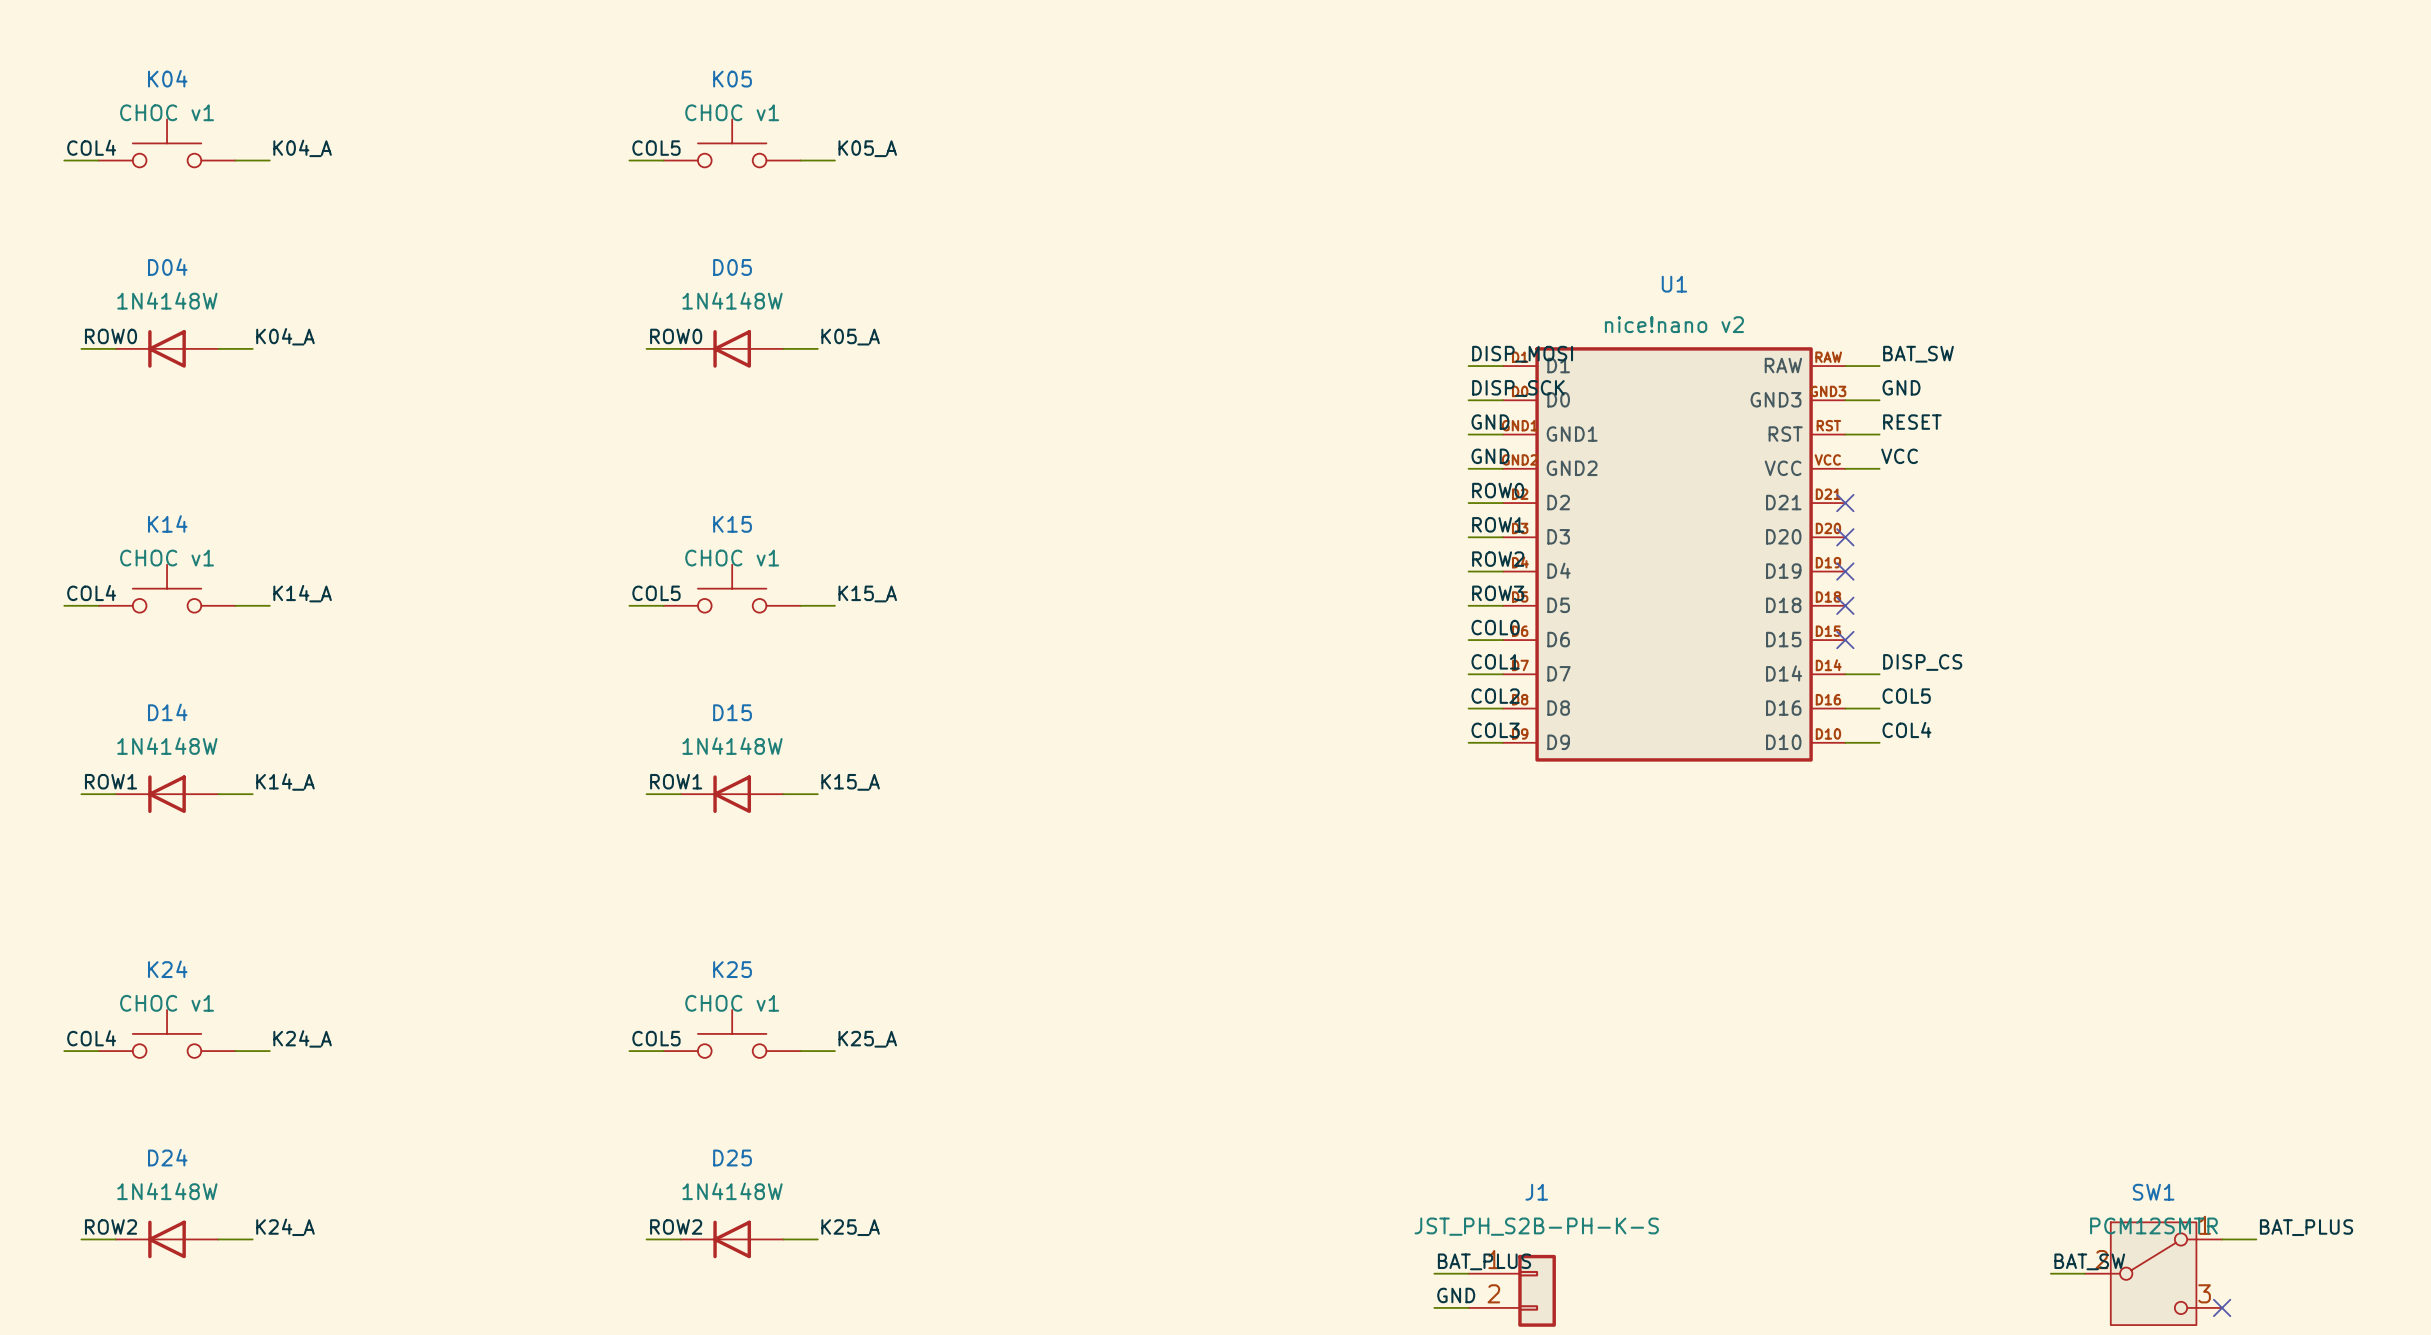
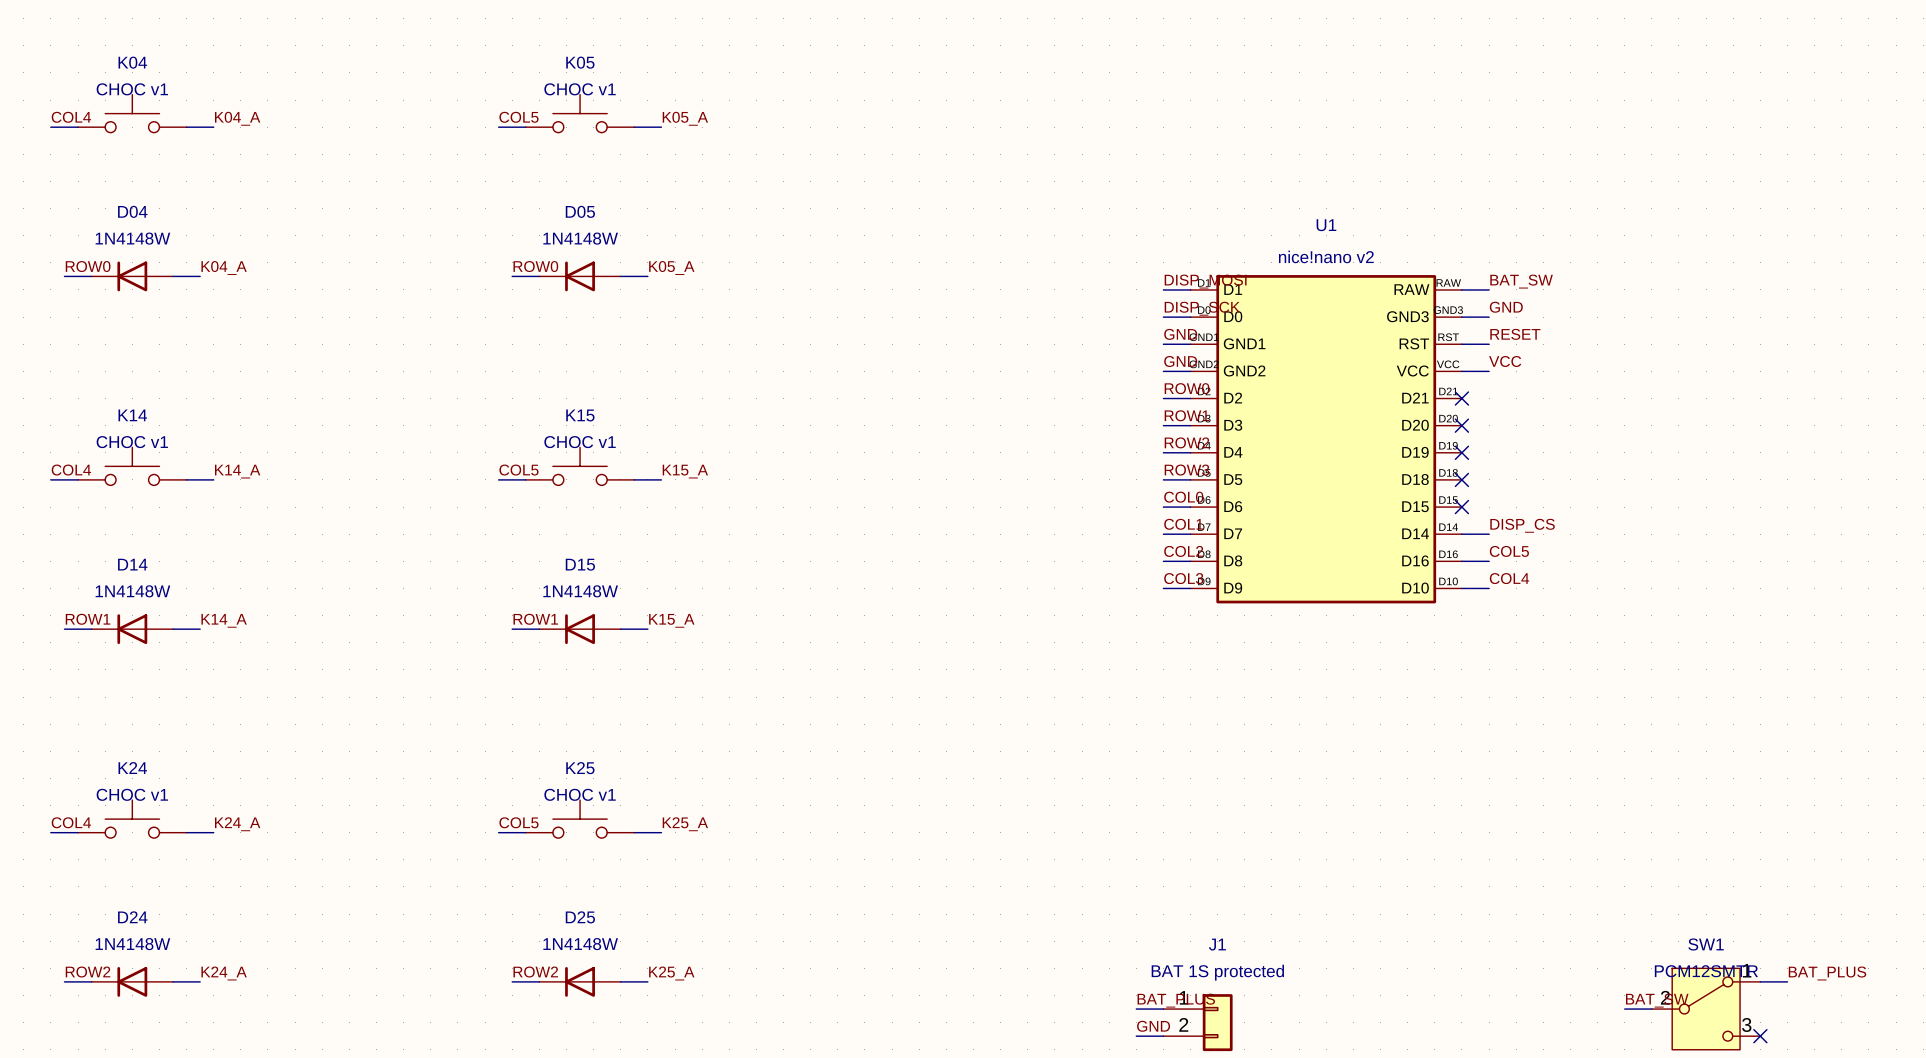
J1 value: JST_PH_S2B-PH-K-S (1536, 1226) -> BAT 1S protected (1217, 972)

